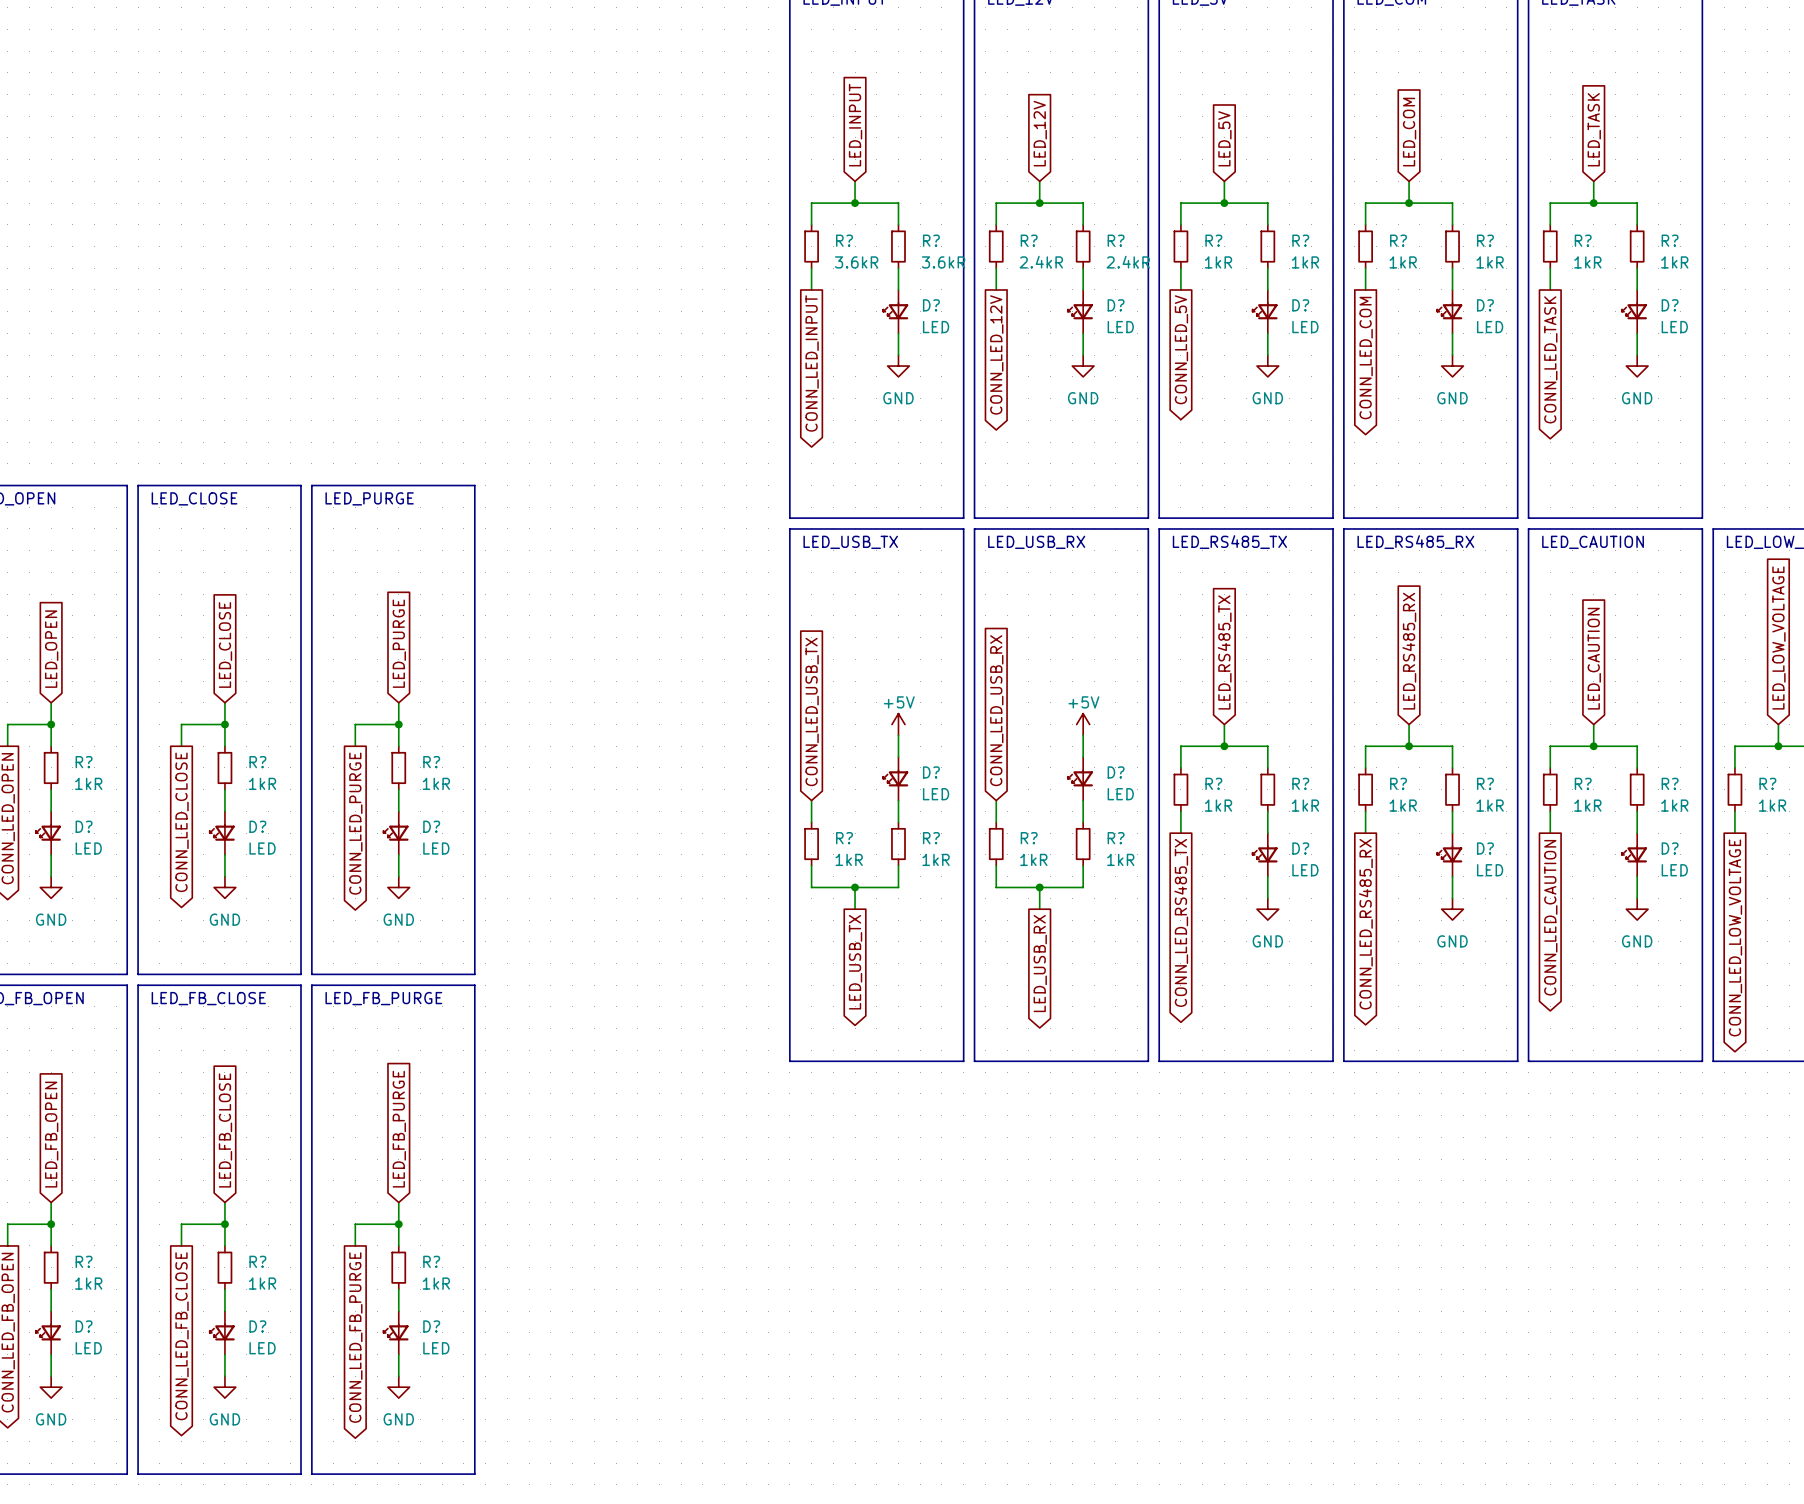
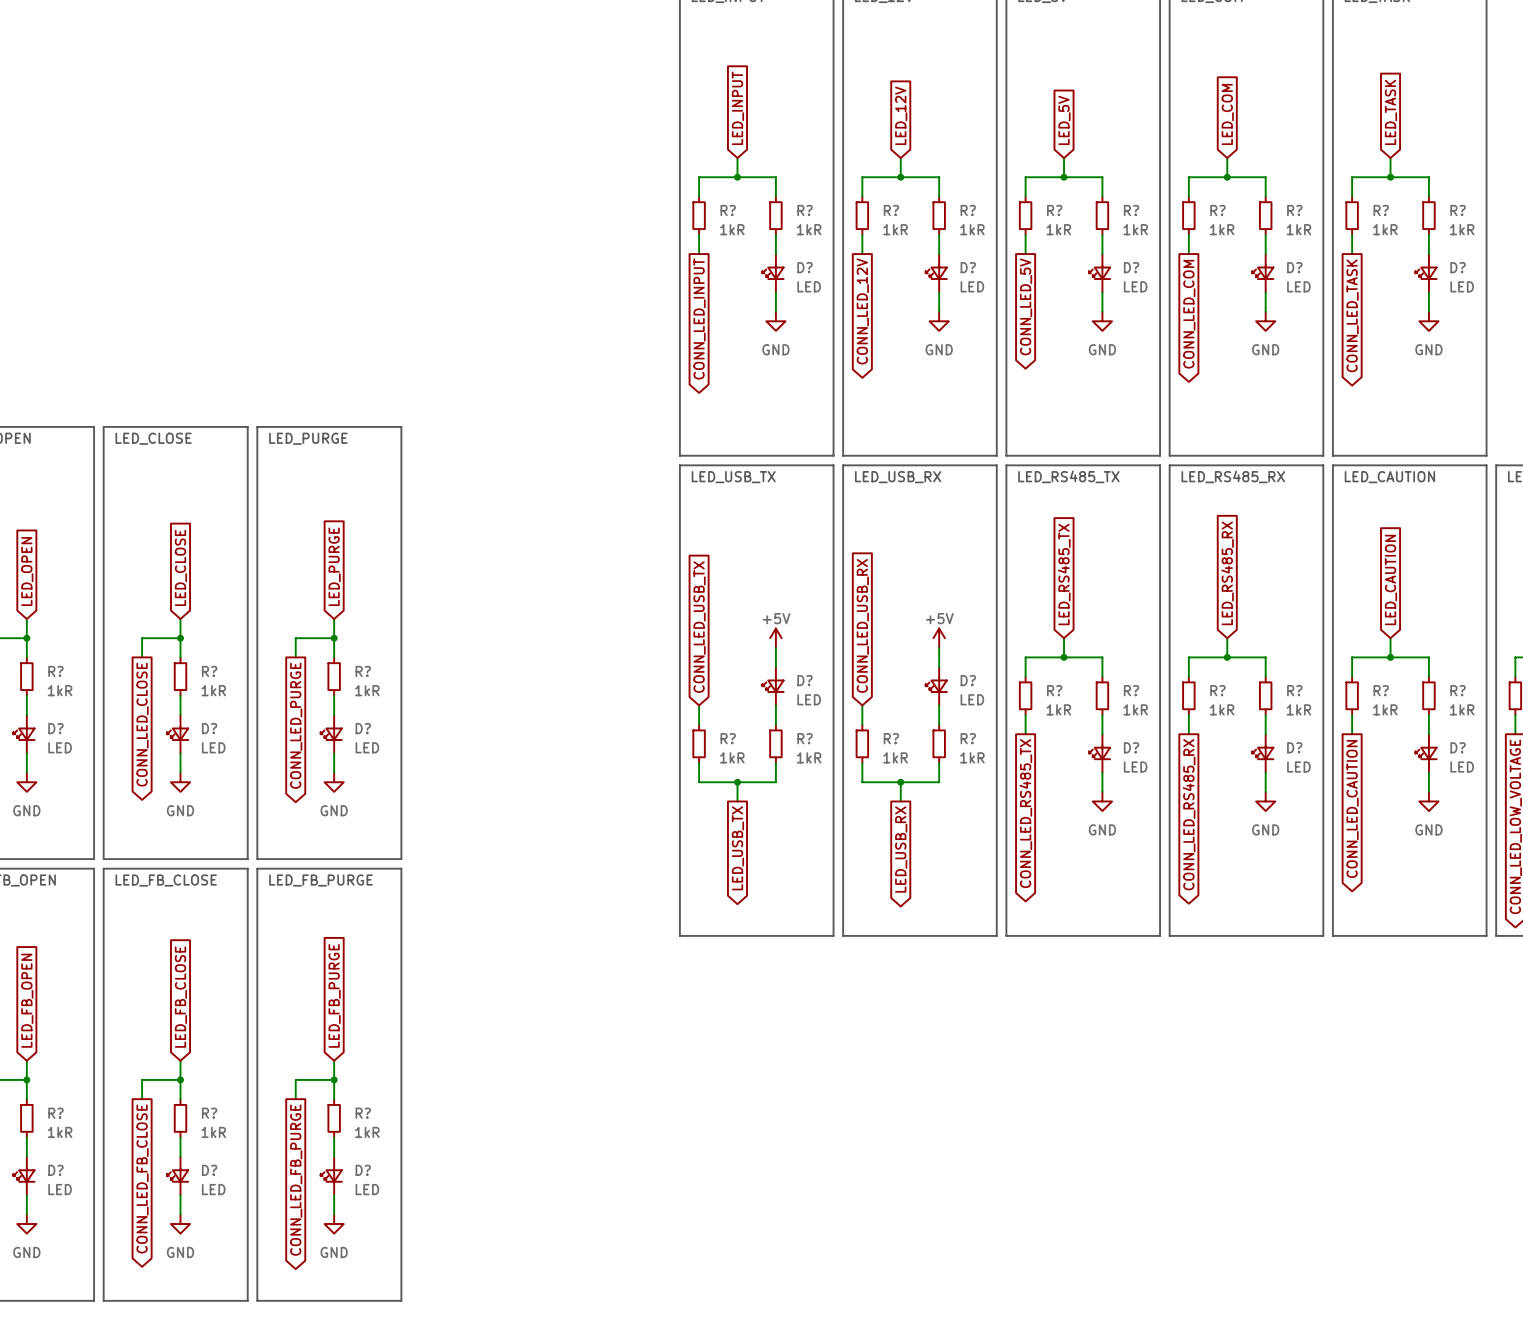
R? value: 3.6kR (856, 262) -> 1kR (732, 229)
R? value: 3.6kR (943, 262) -> 1kR (809, 229)
R? value: 2.4kR (1041, 262) -> 1kR (895, 229)
R? value: 2.4kR (1128, 262) -> 1kR (972, 229)

